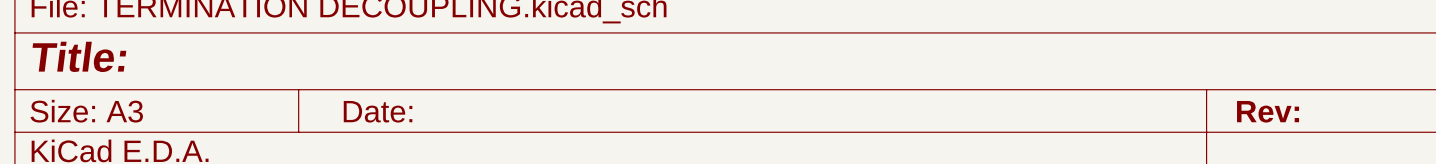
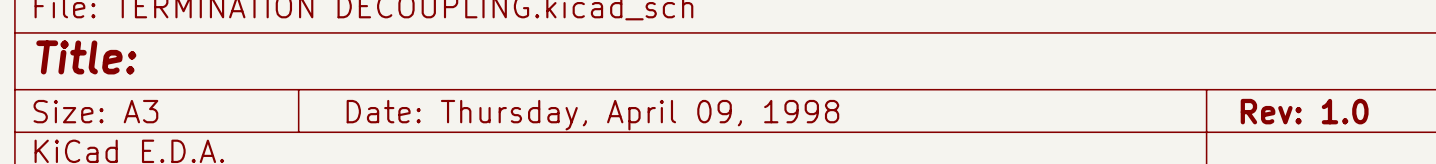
title block: Date: (378, 111) -> Date: Thursday, April 09, 1998 (592, 115)
title block: Rev: (1268, 111) -> Rev: 1.0 (1304, 111)

